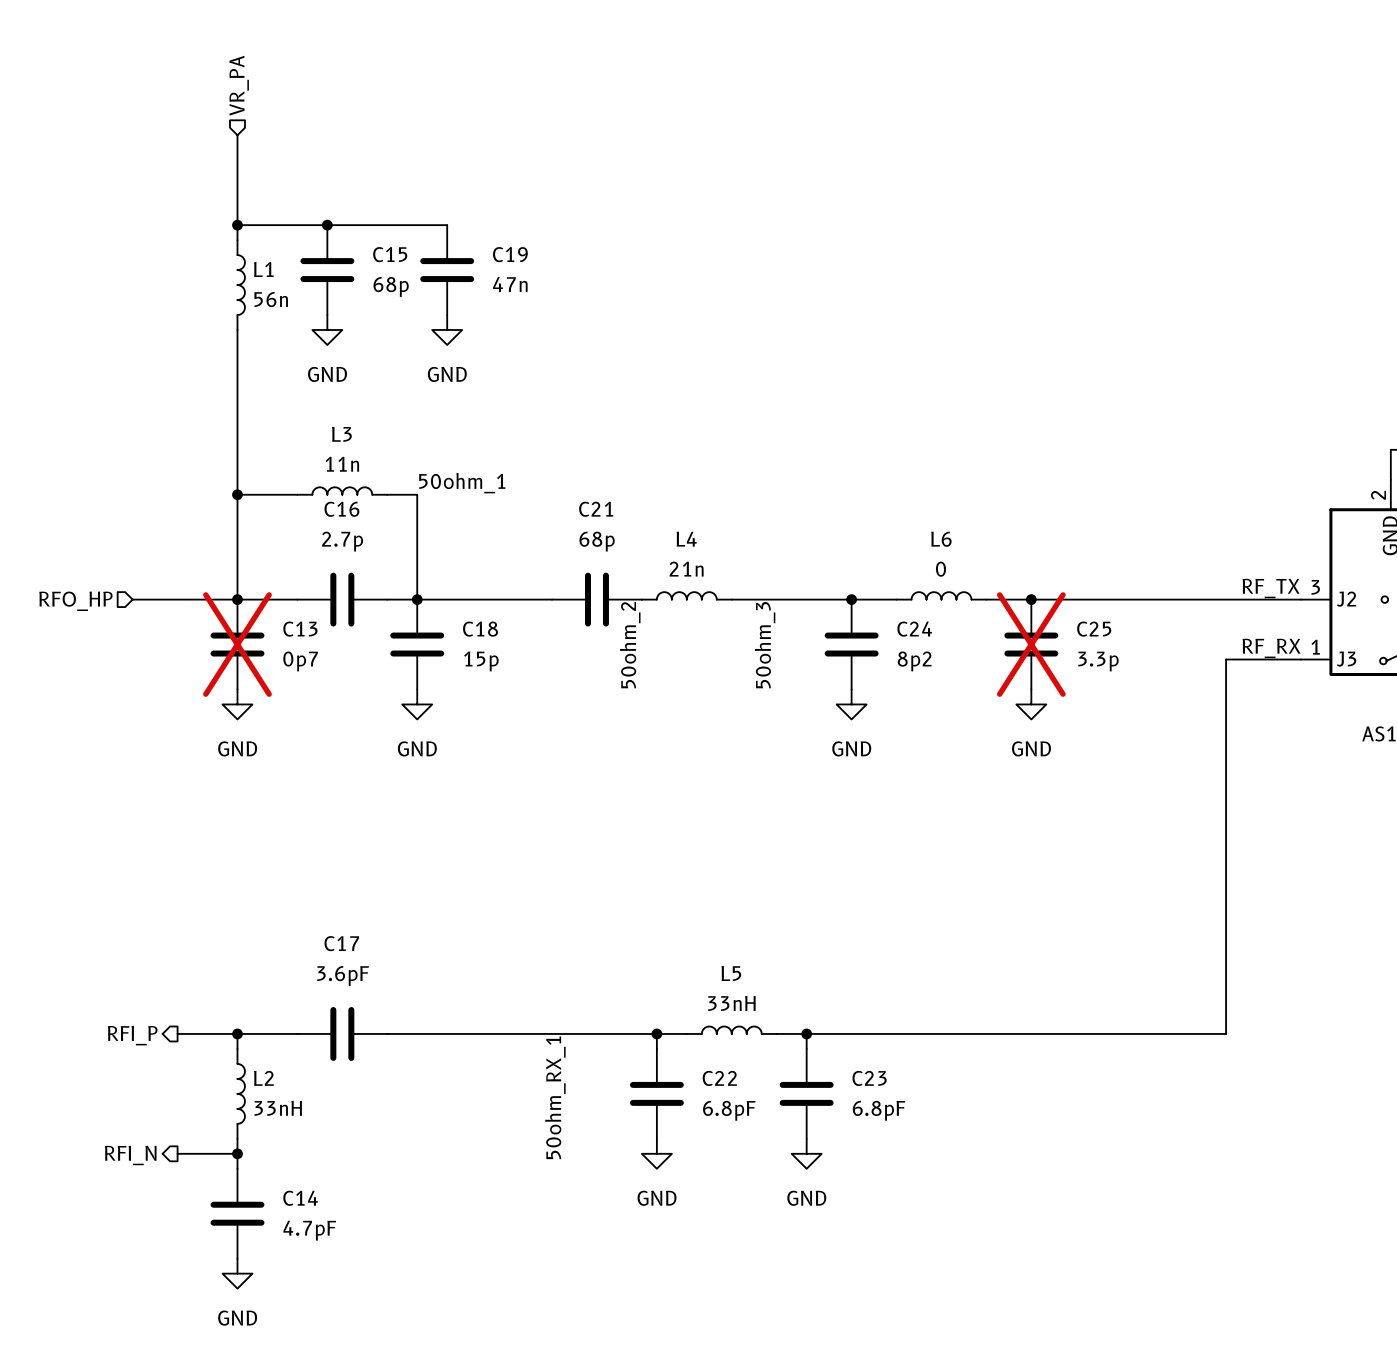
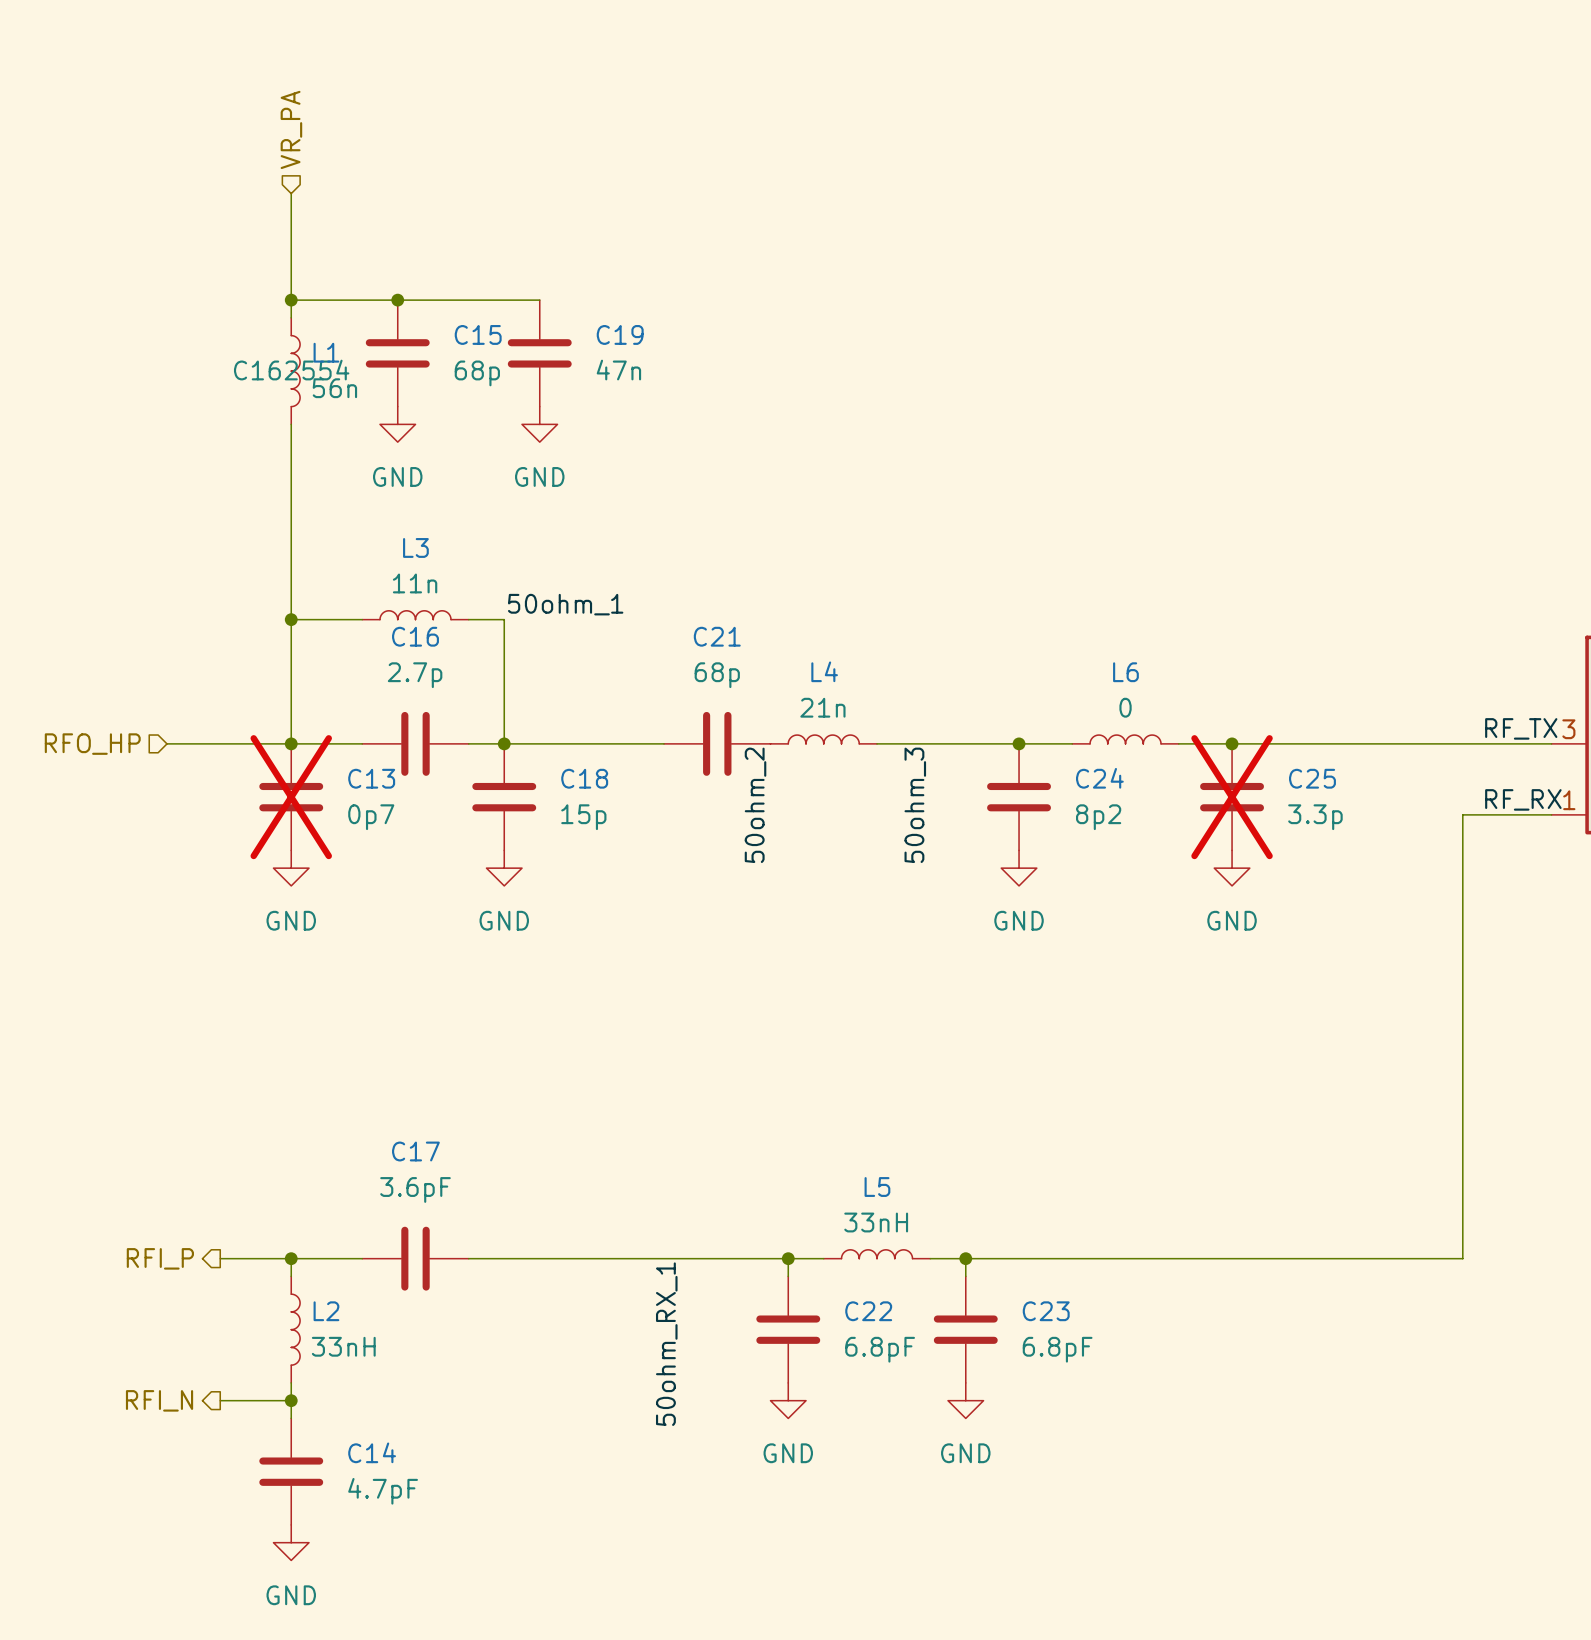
L1 text: none -> C162554 (291, 370)

